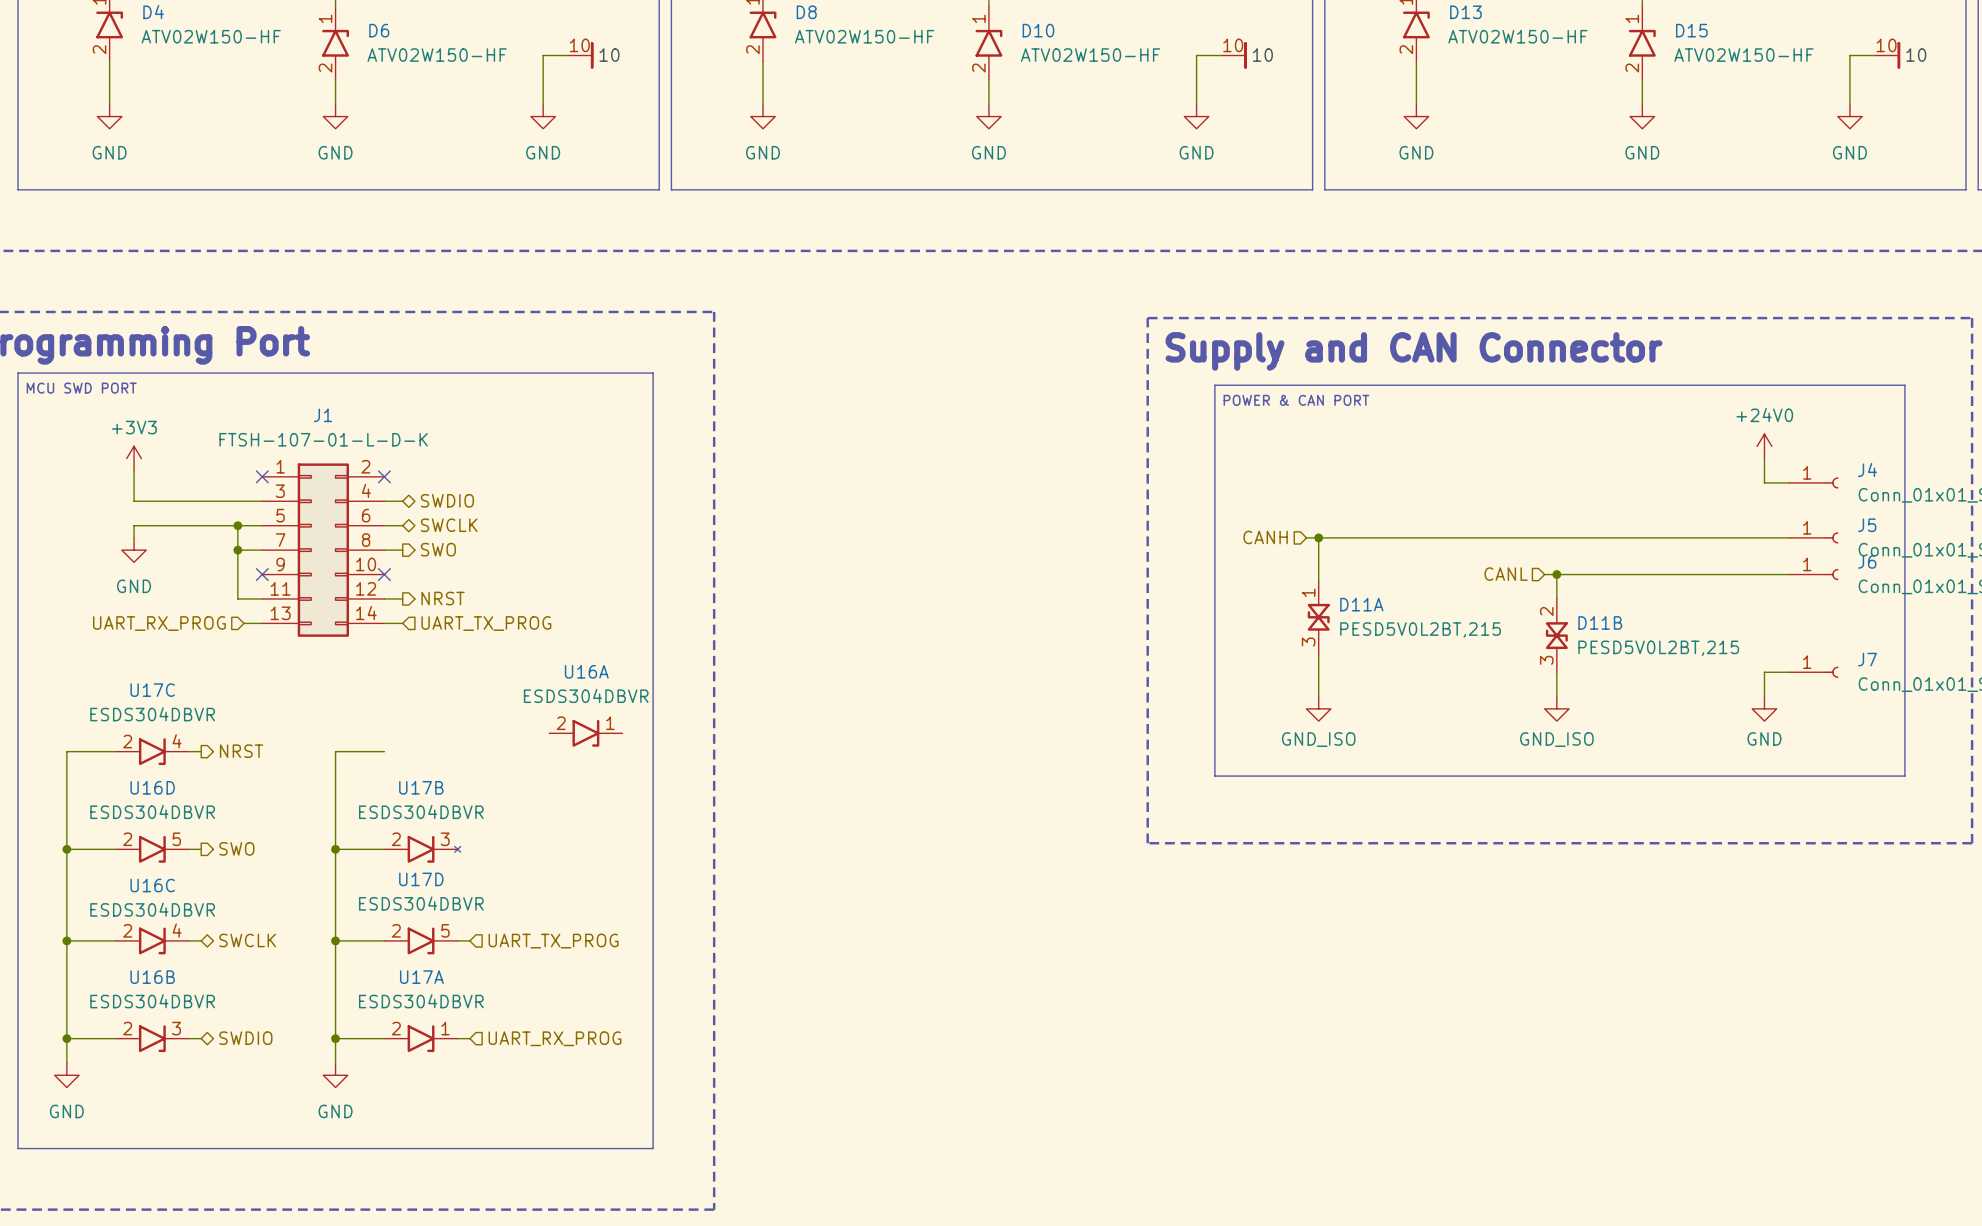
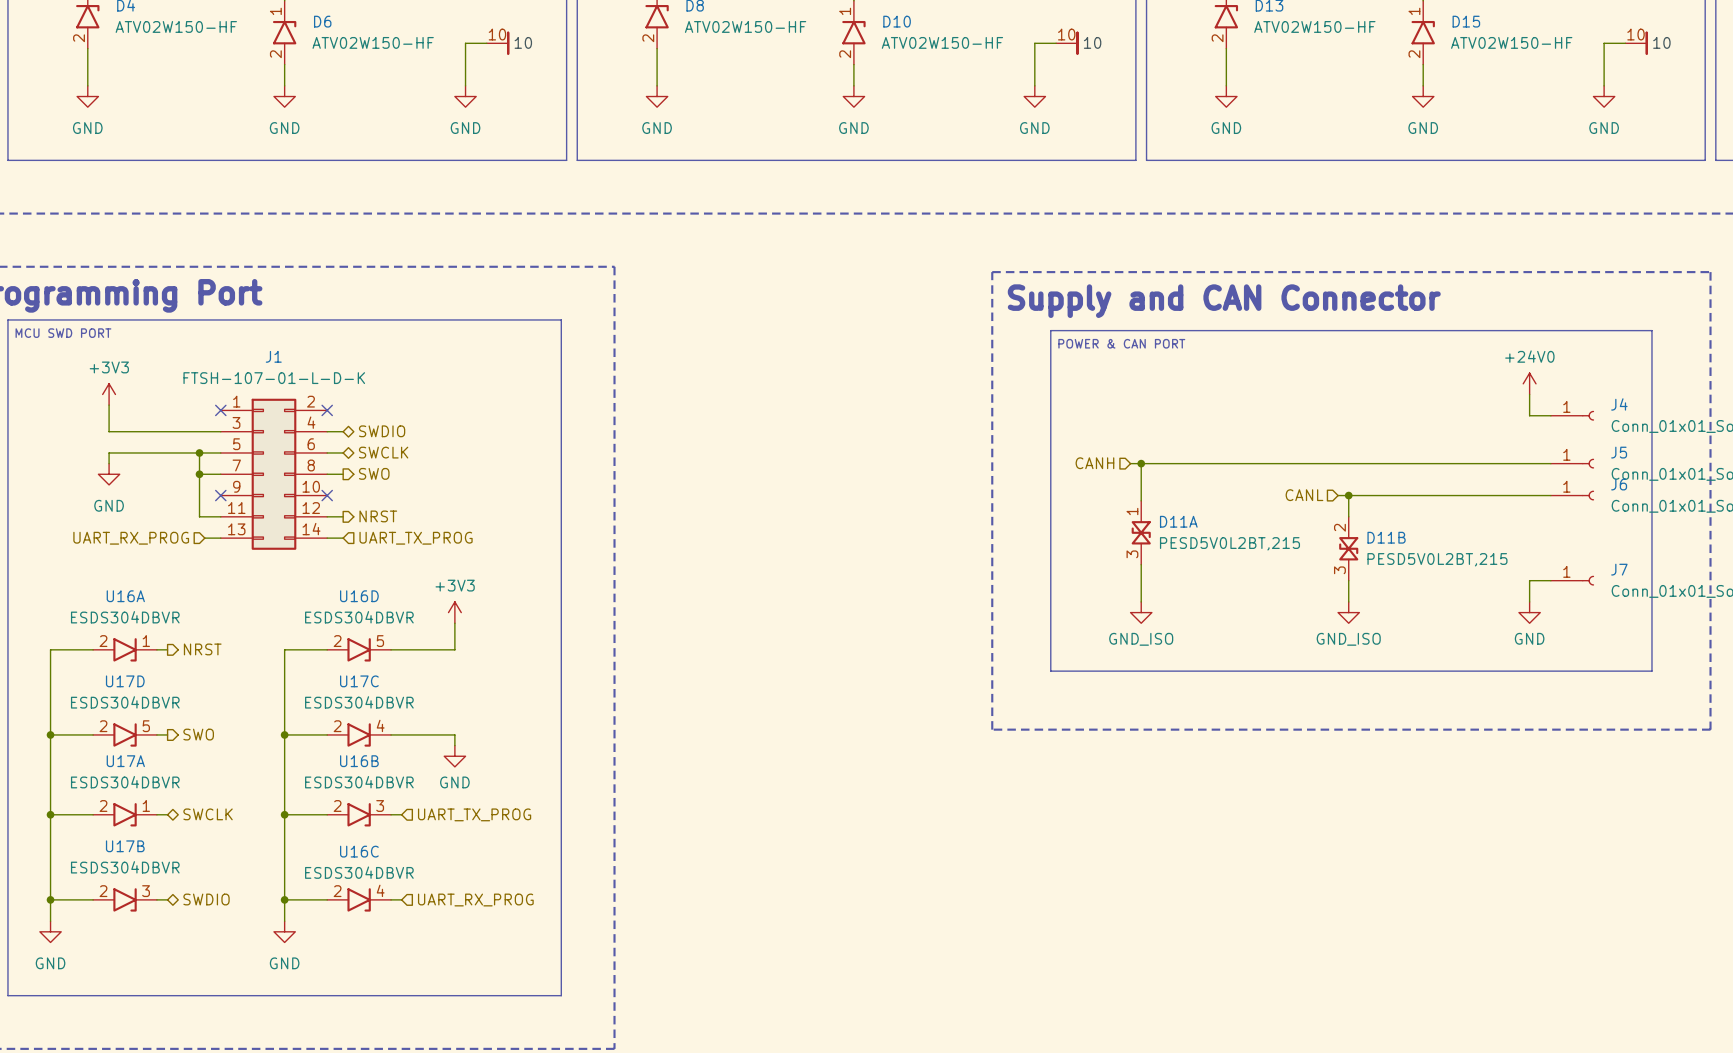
power symbol: none -> +3V3 (454, 612)
wire: none -> (454, 623) (454, 649) (391, 649)
U16A position: (585, 733) -> (125, 649)
U17C position: (152, 751) -> (359, 734)
U16D: none -> ESDS304DBVR (359, 649)
U16D name: U16D (152, 787) -> U17D (125, 681)
U17B: ESDS304DBVR (422, 849) -> none
wire: none -> (391, 734) (454, 734) (454, 745)
power symbol: none -> GND (454, 756)
U17D name: U17D (421, 879) -> U16B (359, 761)
U17D pin number: 5 (445, 930) -> 3 (380, 806)
U16C position: (152, 940) -> (359, 899)
U16B name: U16B (152, 977) -> U17B (125, 846)
U17A position: (421, 1038) -> (125, 814)

